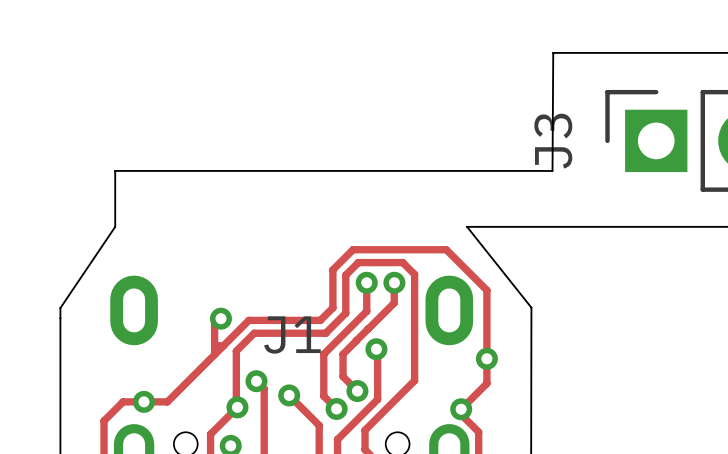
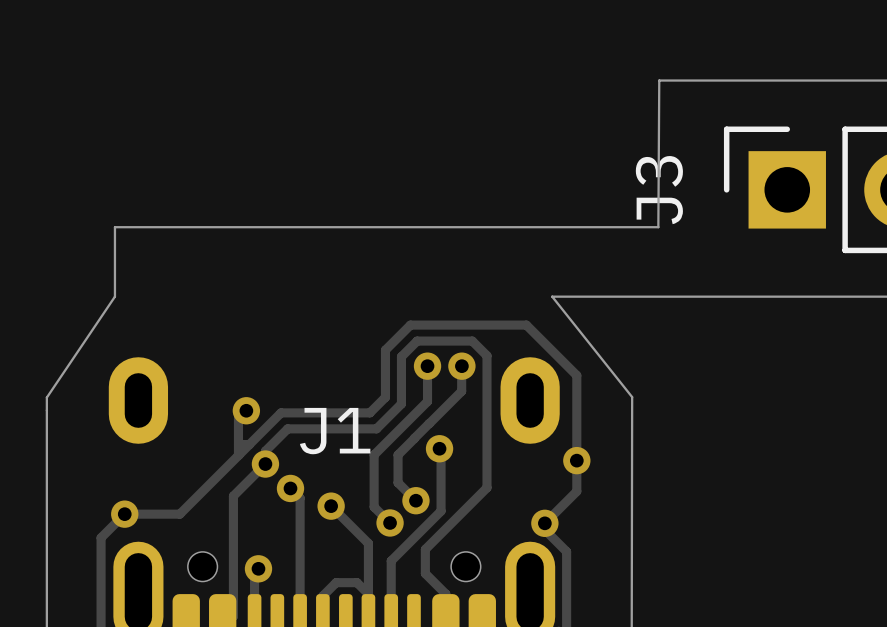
track: (236, 361) (237, 407) (210, 434) -> (265, 464) (233, 496) (233, 554)
via position: (143, 401) -> (124, 514)
via position: (237, 407) -> (265, 464)

